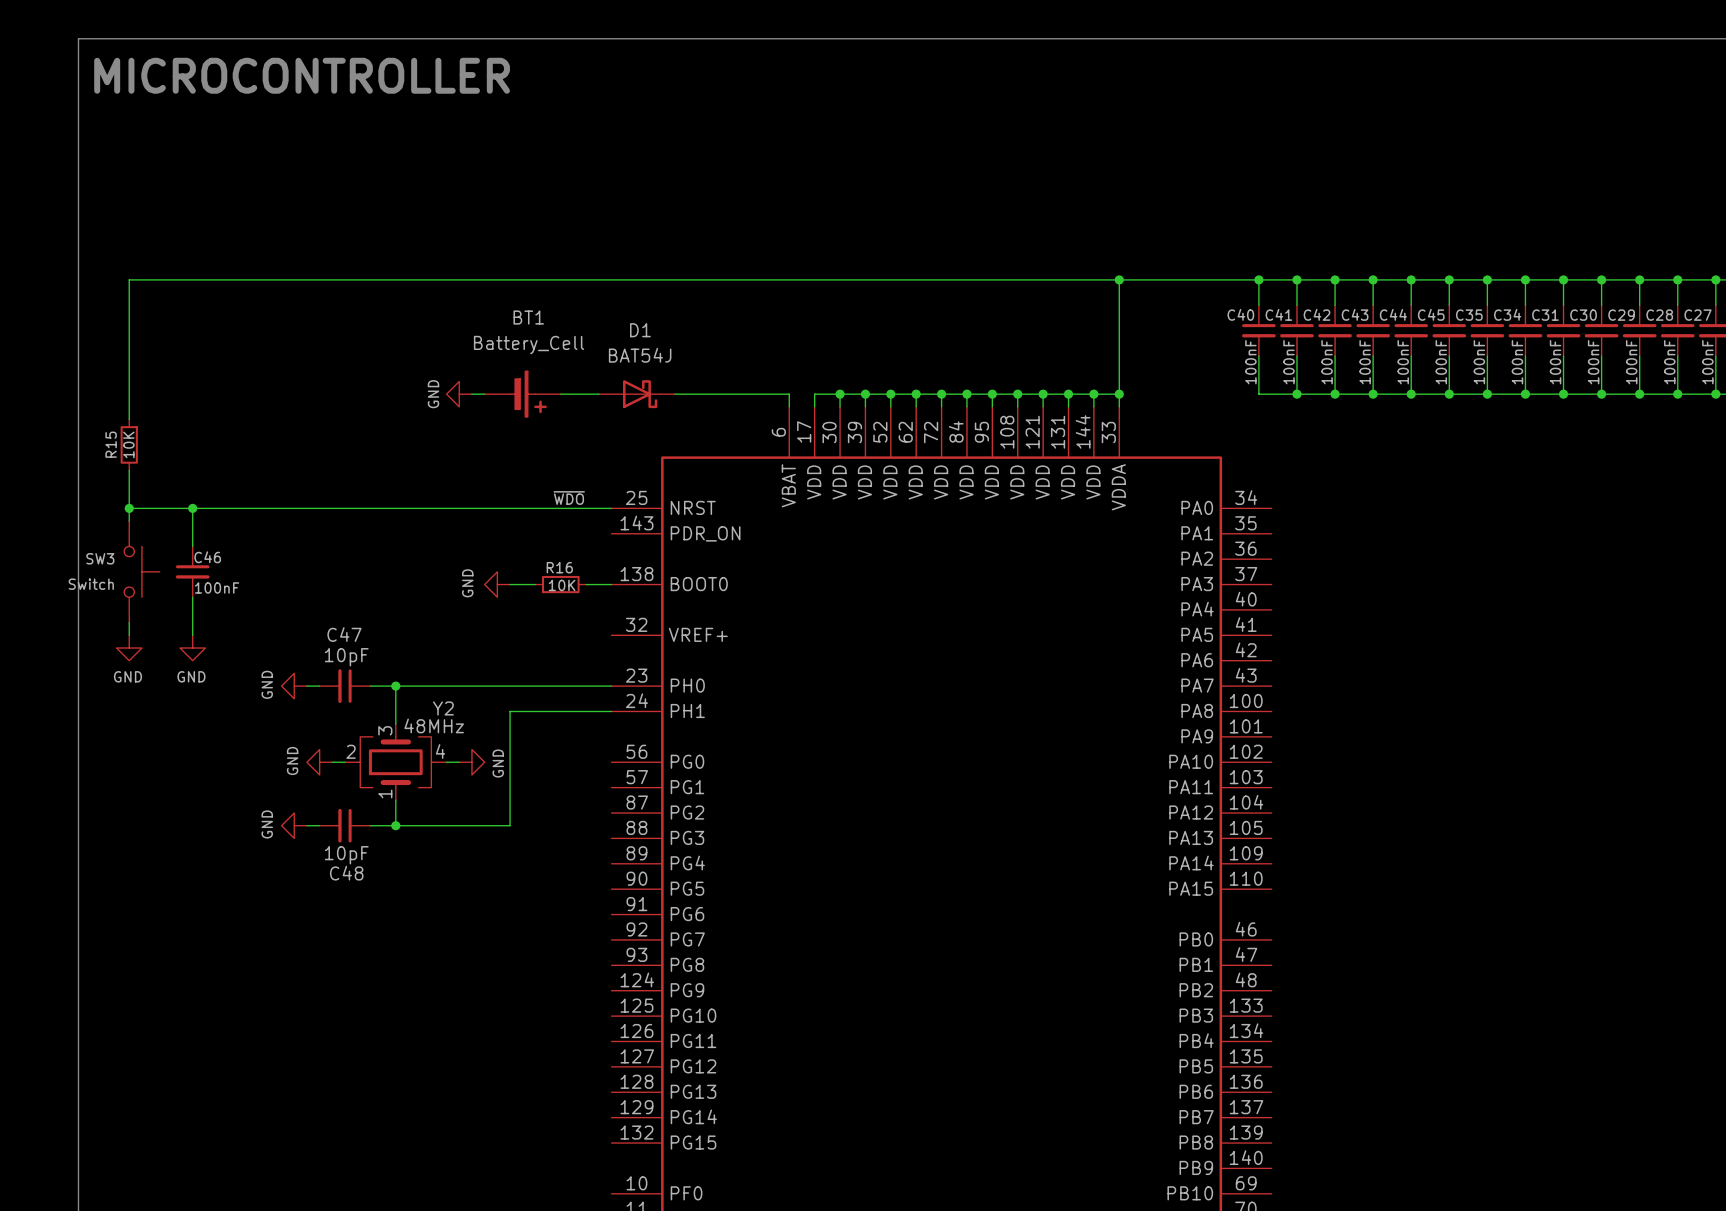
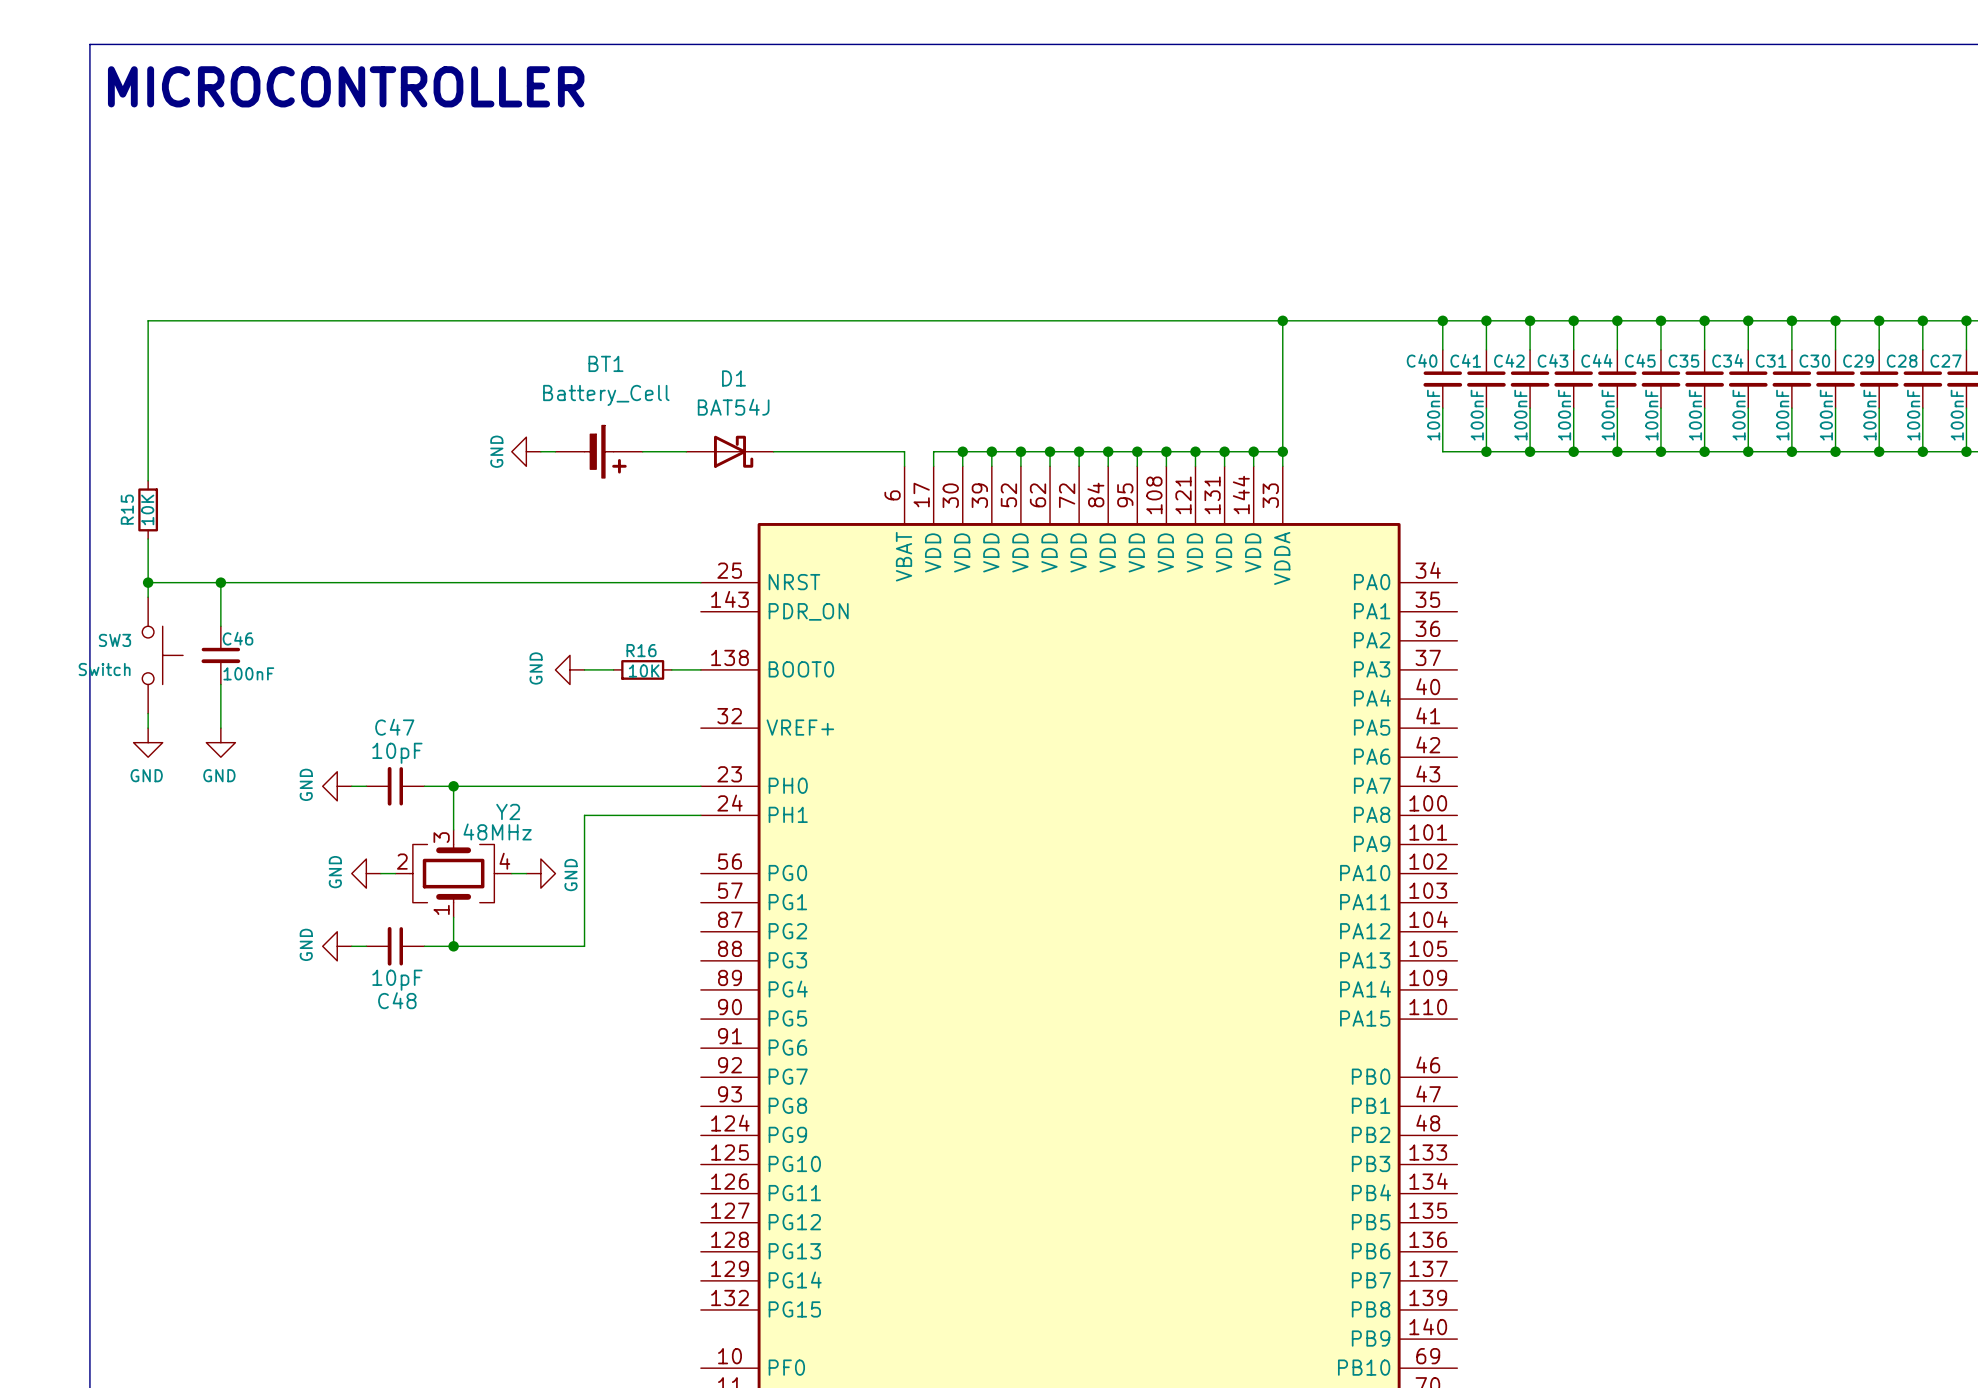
label: ~{WDO} (569, 498) -> none

